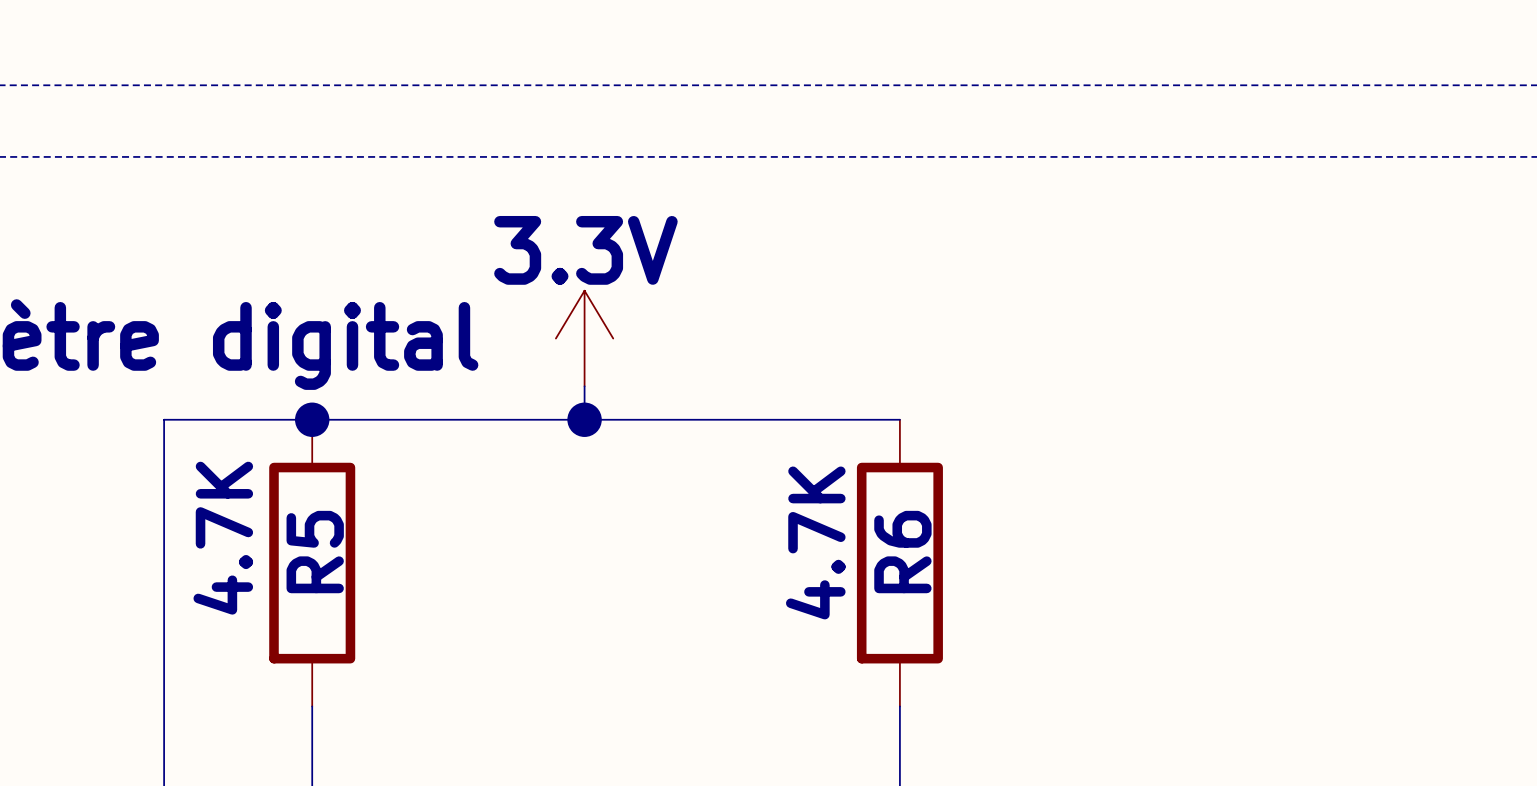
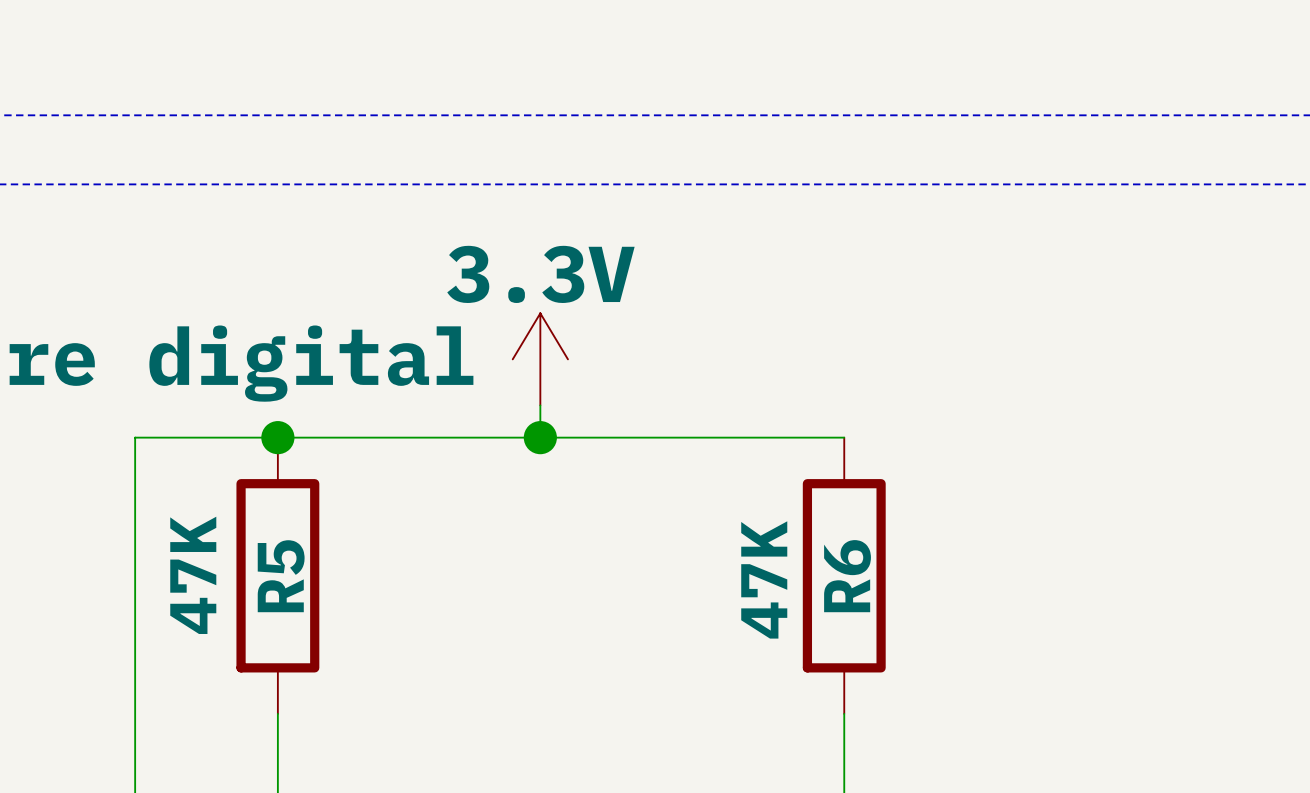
R5 value: 4.7K (223, 538) -> 47K (193, 575)
R6 value: 4.7K (815, 542) -> 47K (764, 579)

